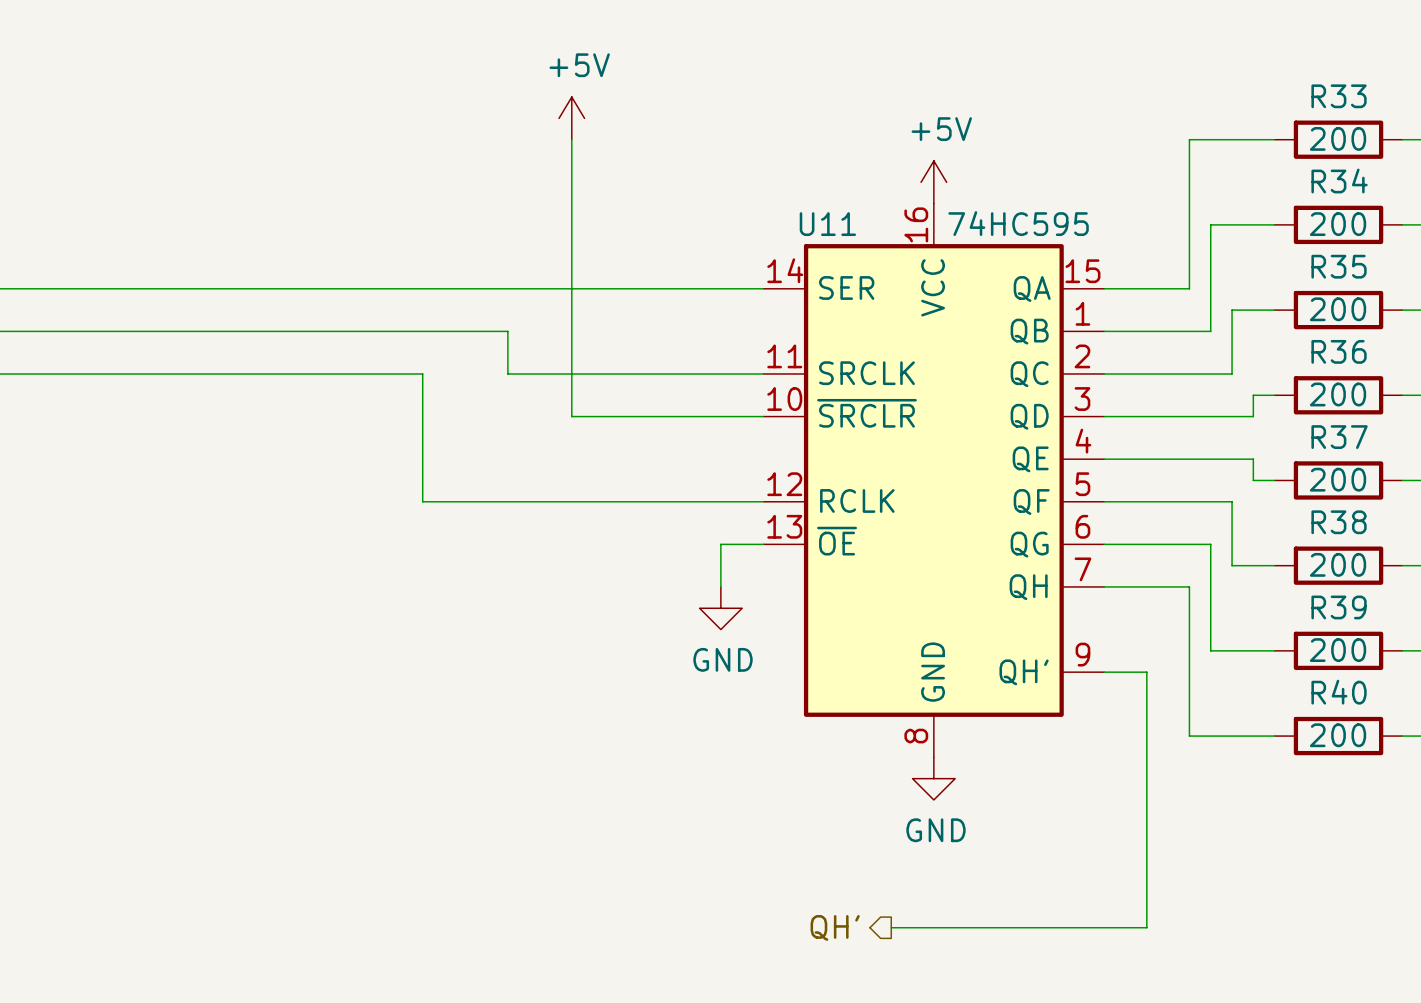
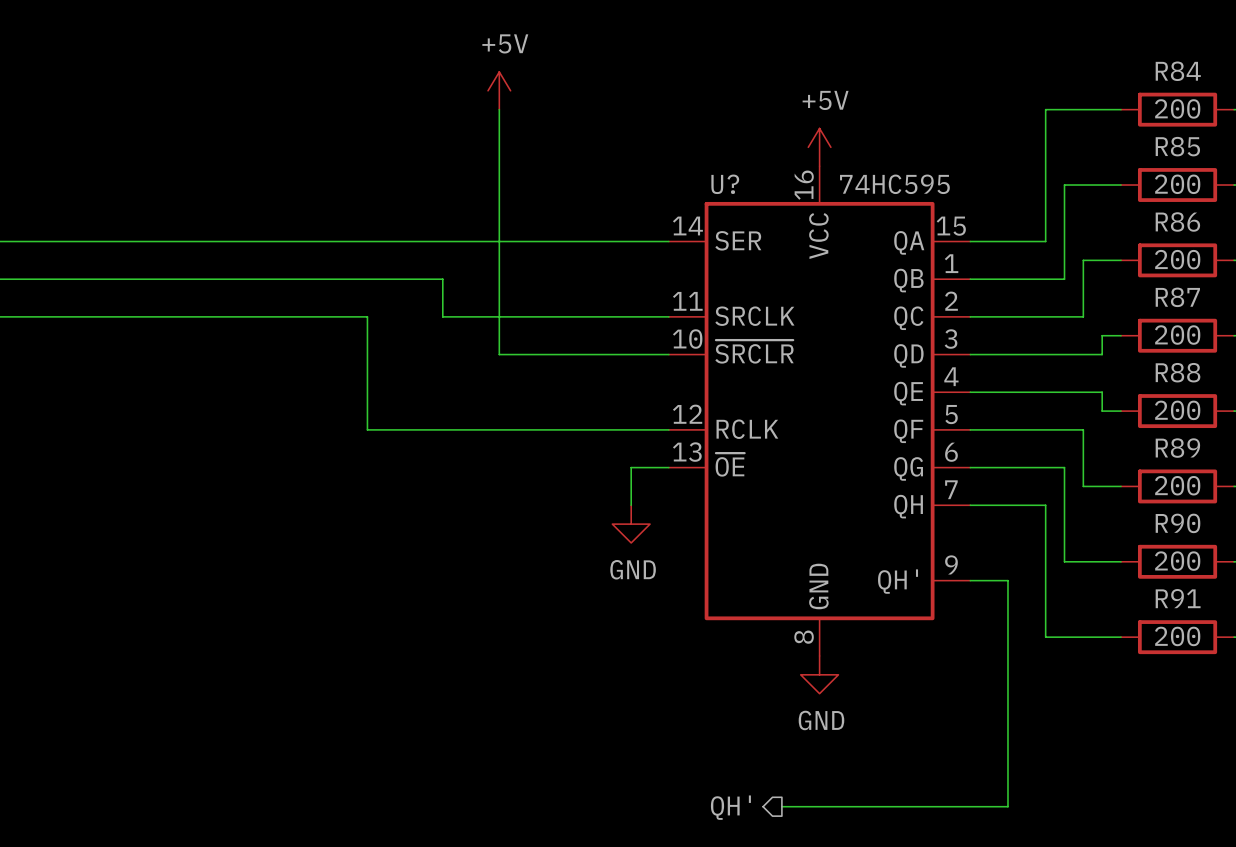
R33 name: R33 (1339, 96) -> R84 (1178, 71)
R34 name: R34 (1339, 181) -> R85 (1177, 146)
U11 name: U11 (827, 224) -> U? (725, 184)
R35 name: R35 (1339, 266) -> R86 (1177, 221)
R36 name: R36 (1339, 351) -> R87 (1177, 297)
R37 name: R37 (1339, 437) -> R88 (1178, 372)
R38 name: R38 (1339, 522) -> R89 (1177, 448)
R39 name: R39 (1339, 607) -> R90 (1178, 523)
R40 name: R40 (1339, 692) -> R91 (1178, 598)

